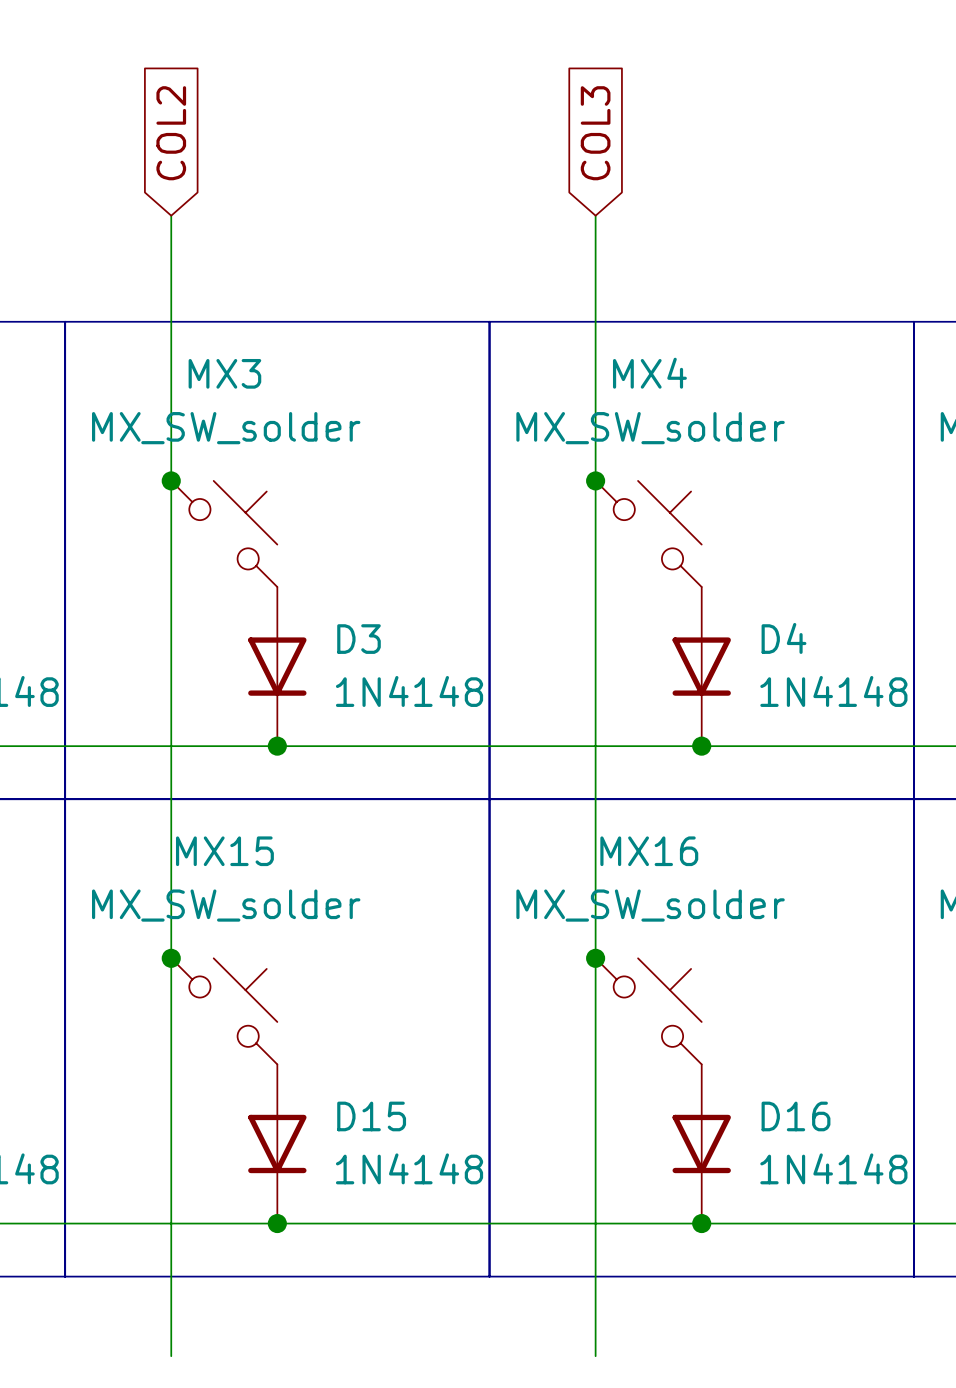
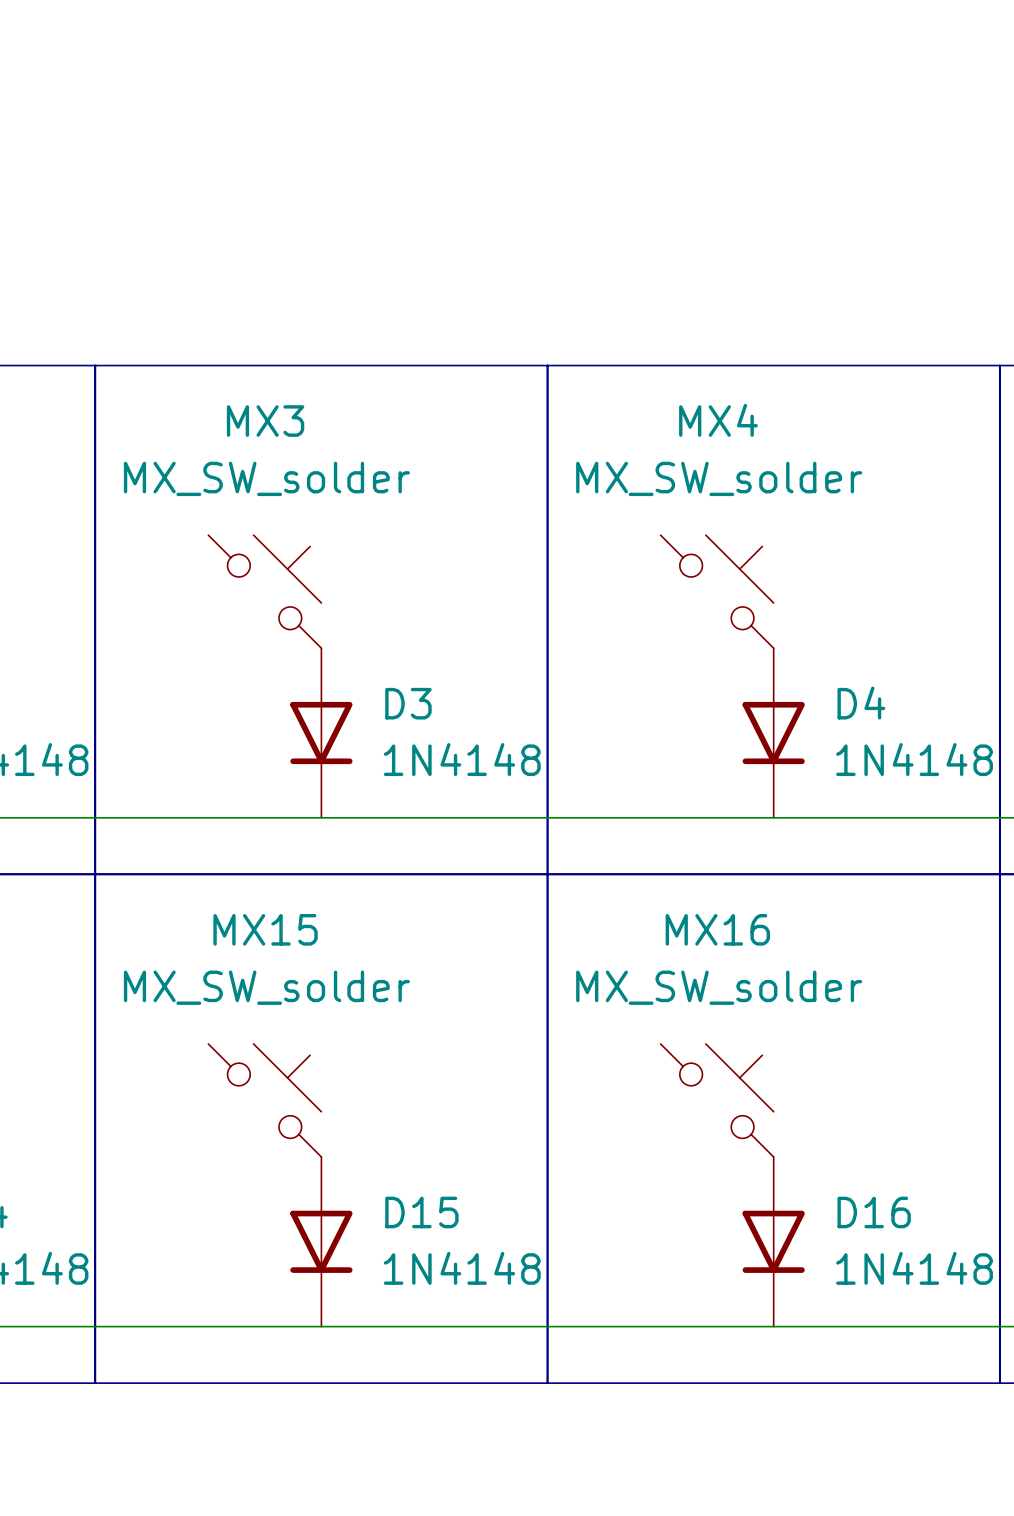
global label: COL2 (171, 133) -> none
global label: COL3 (595, 133) -> none
wire: (171, 215) (171, 1356) -> none
wire: (595, 215) (595, 1356) -> none
junction: (171, 480) -> none
junction: (595, 480) -> none
junction: (277, 746) -> none
junction: (701, 746) -> none
junction: (171, 958) -> none
junction: (595, 958) -> none
junction: (277, 1223) -> none
junction: (701, 1223) -> none

